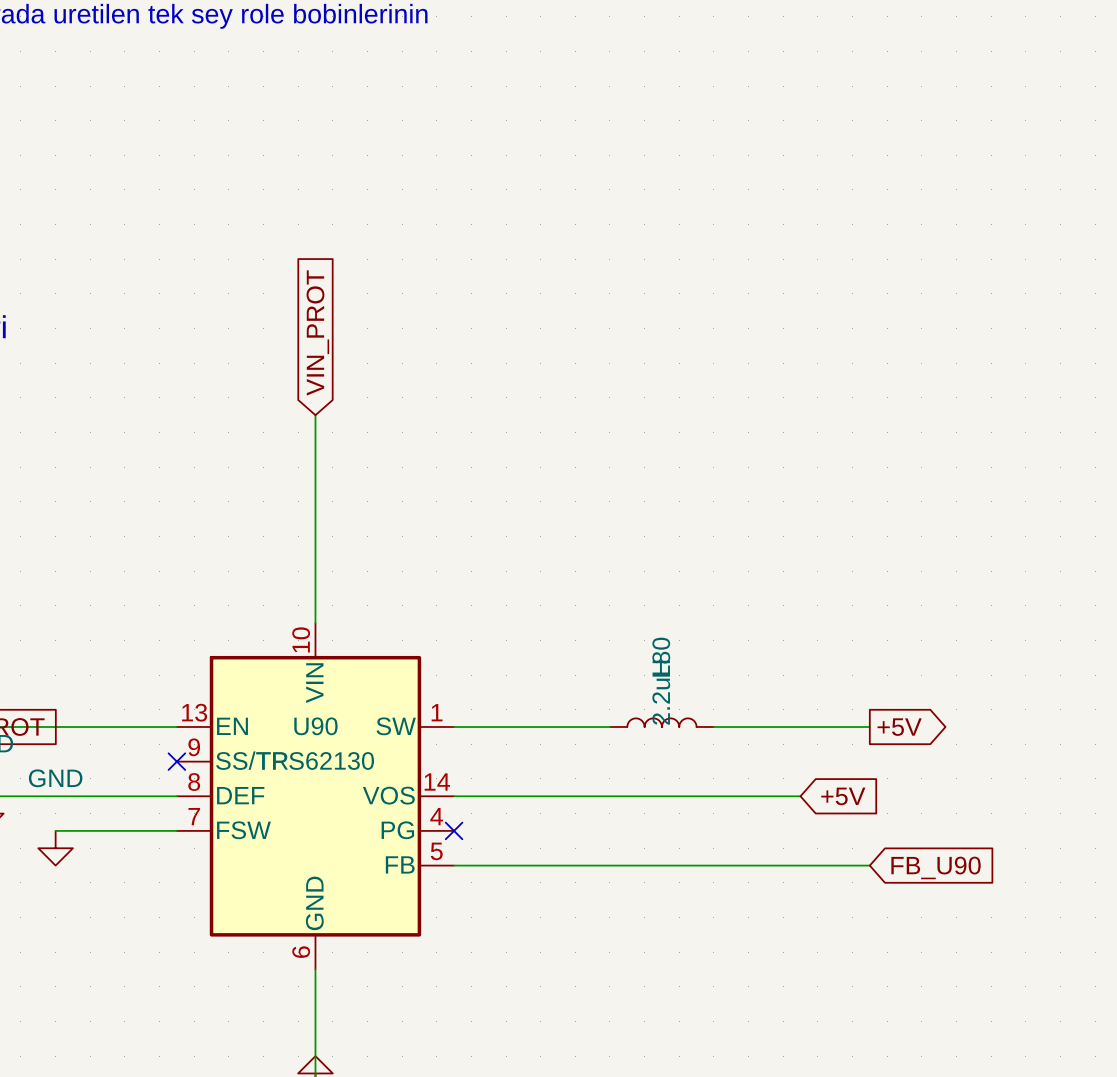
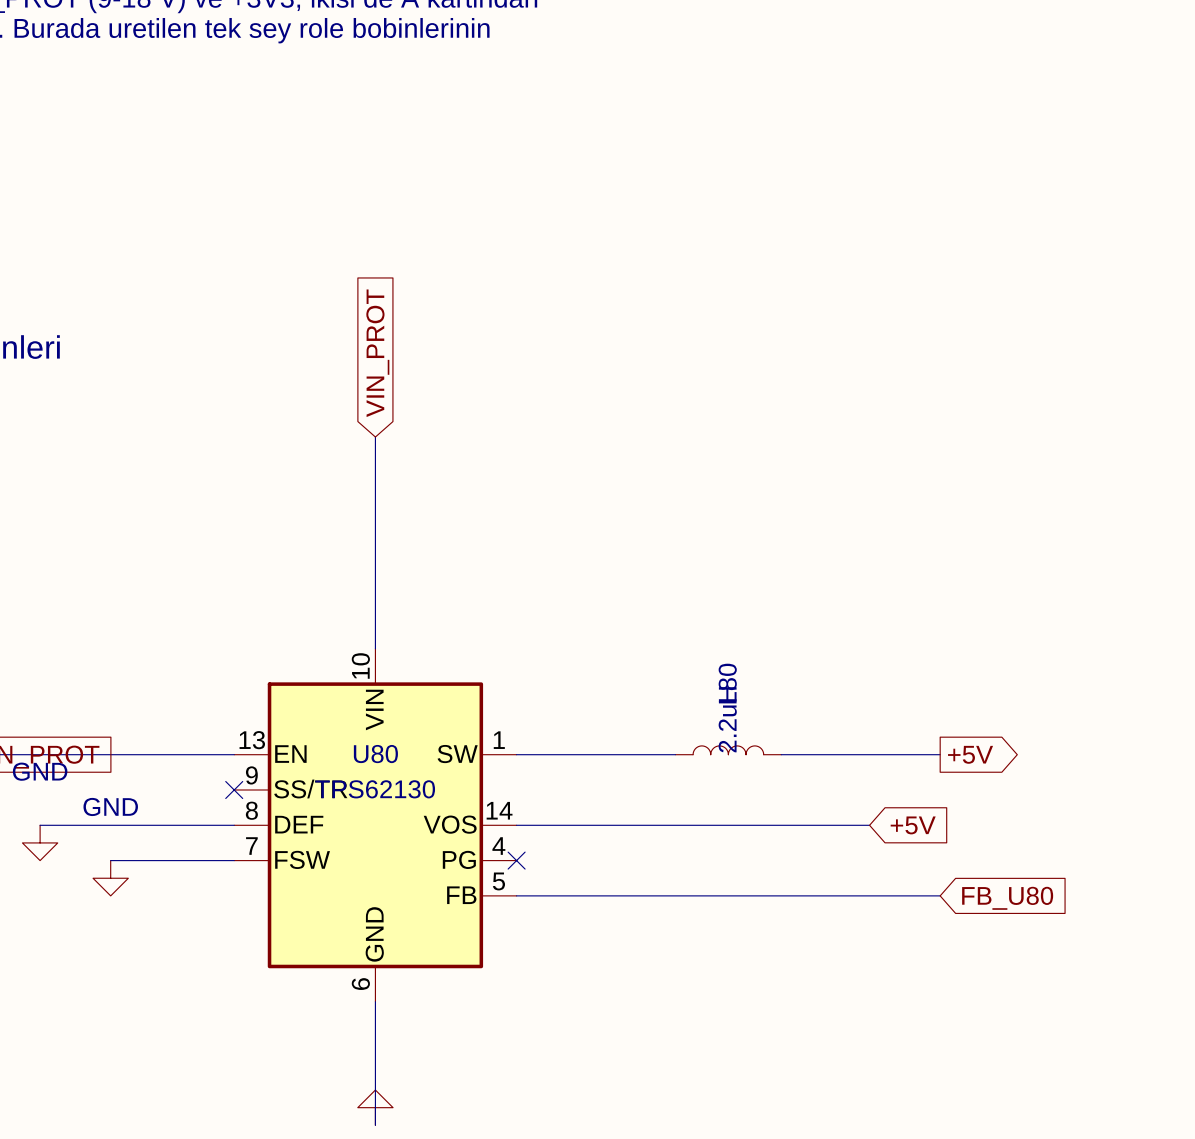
U90 name: U90 (315, 726) -> U80 (375, 754)
global label: FB_U90 (936, 867) -> FB_U80 (1007, 898)

